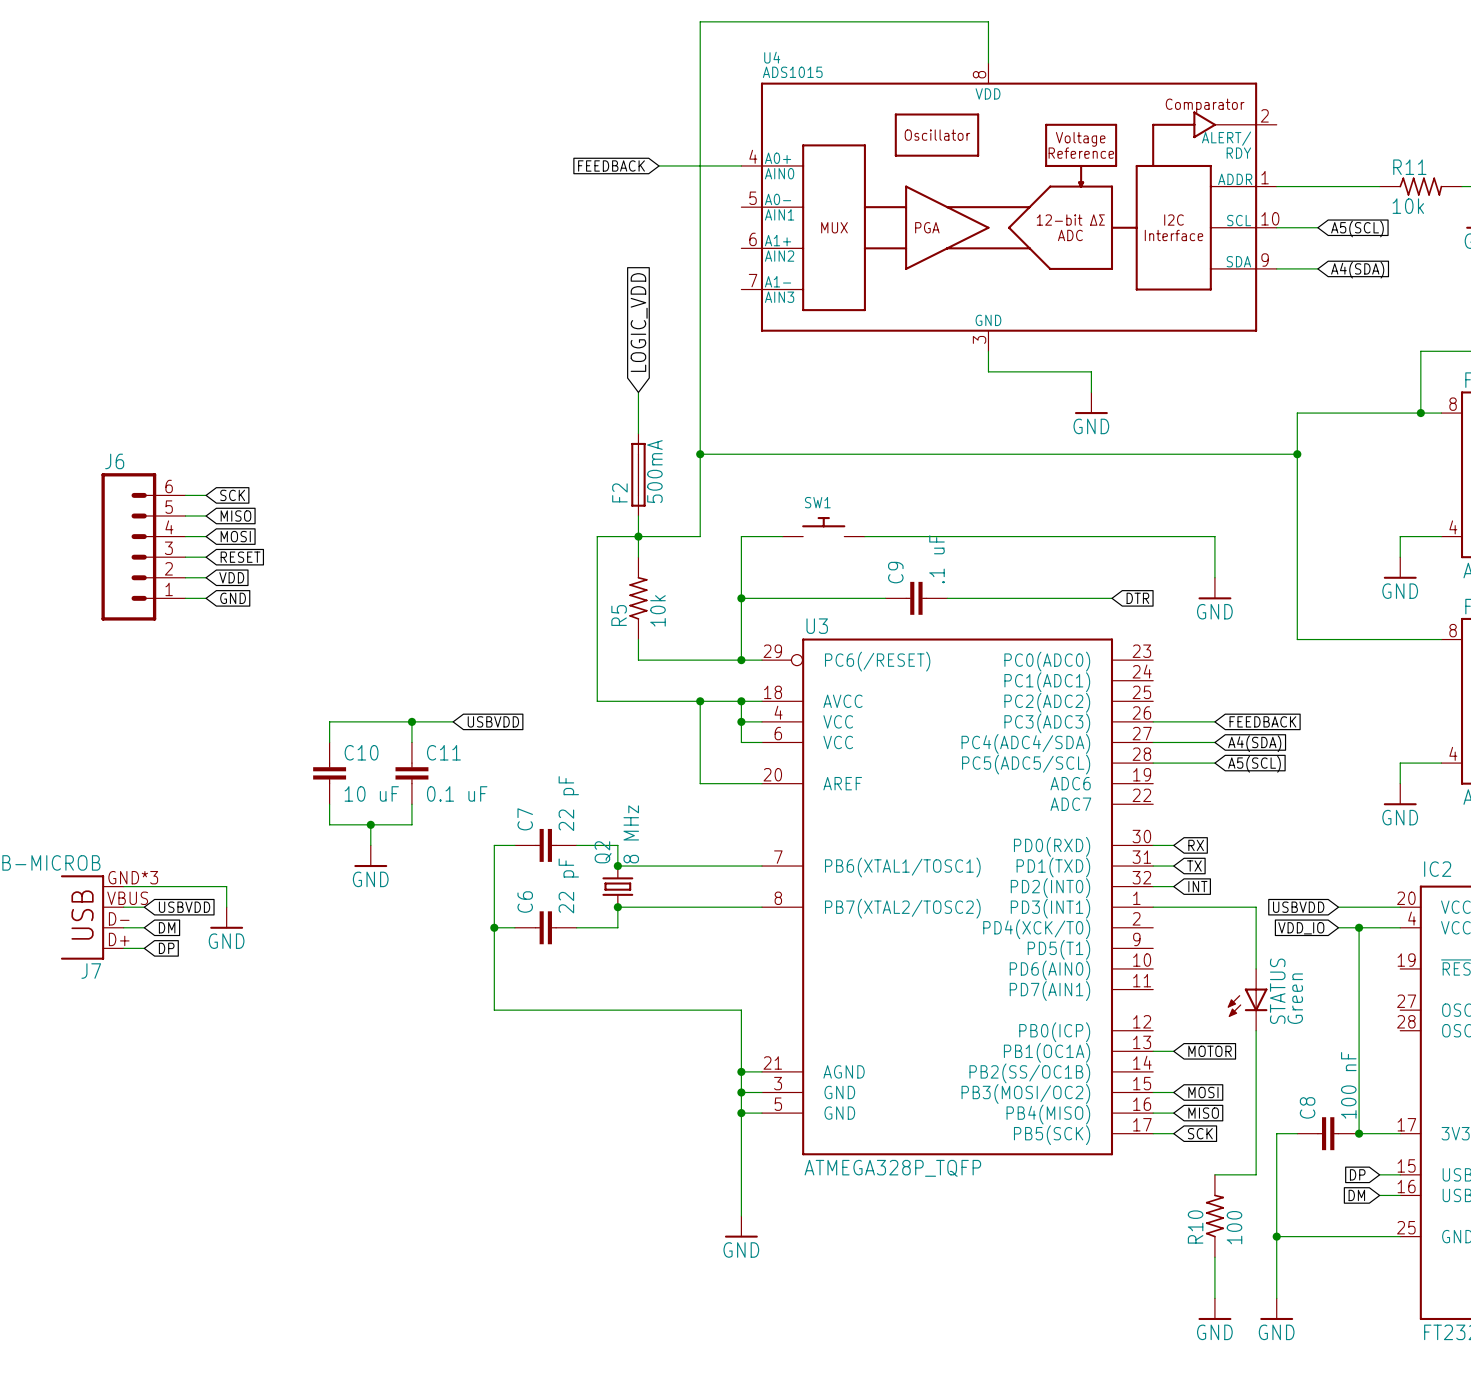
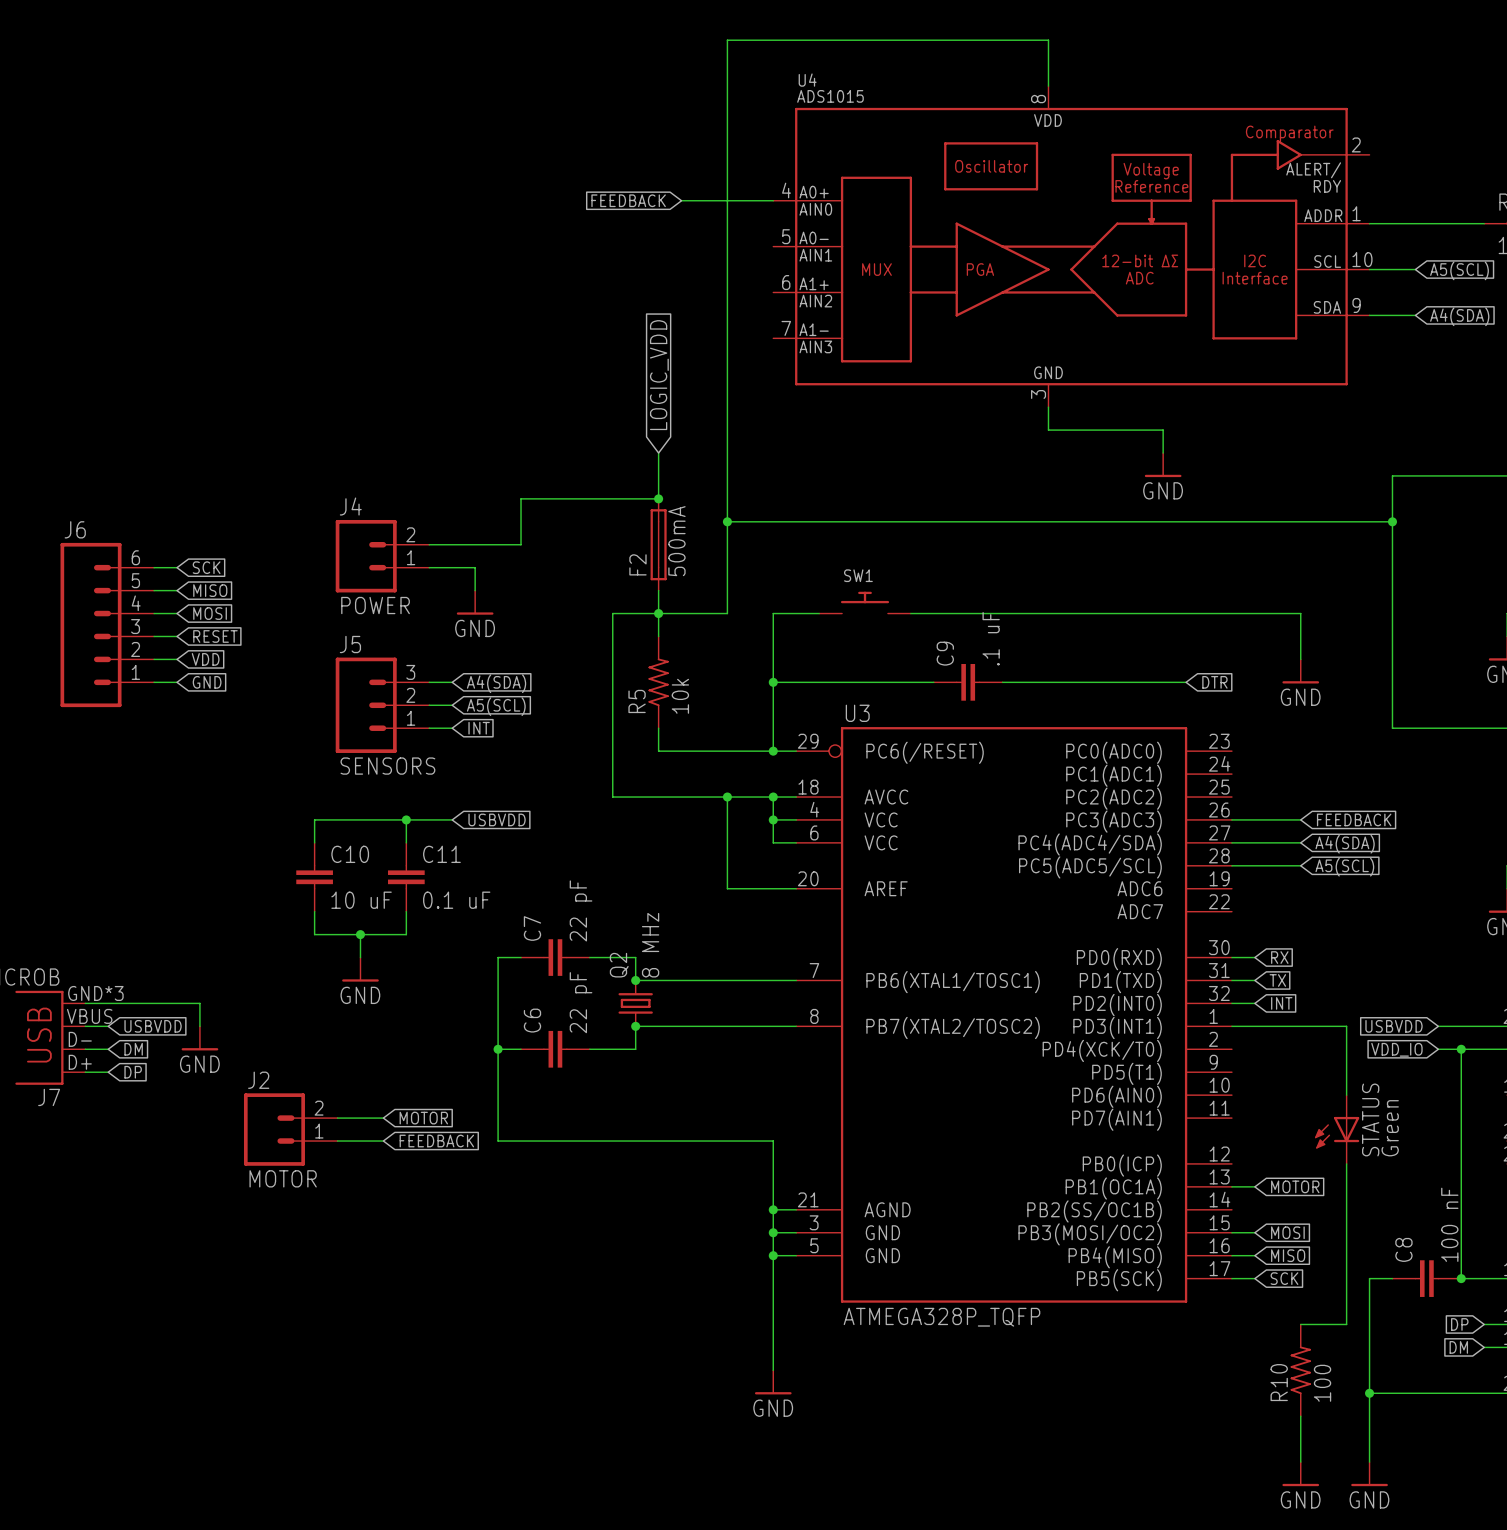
wire: none -> (658, 498) (521, 498) (521, 544) (429, 544)
junction: none -> (658, 498)
J4: none -> POWER (382, 556)
wire: none -> (429, 567) (475, 567) (475, 590)
power symbol: none -> GND (475, 602)
wire: none -> (429, 682) (452, 682)
global label: none -> A4(SDA) (496, 683)
J5: none -> SENSORS (382, 705)
wire: none -> (429, 705) (452, 705)
global label: none -> A5(SCL) (496, 706)
wire: none -> (429, 728) (452, 728)
global label: none -> INT (479, 728)
wire: none -> (337, 1118) (383, 1118)
global label: none -> MOTOR (423, 1118)
J2: none -> MOTOR (290, 1129)
wire: none -> (337, 1141) (383, 1141)
global label: none -> FEEDBACK (436, 1141)

